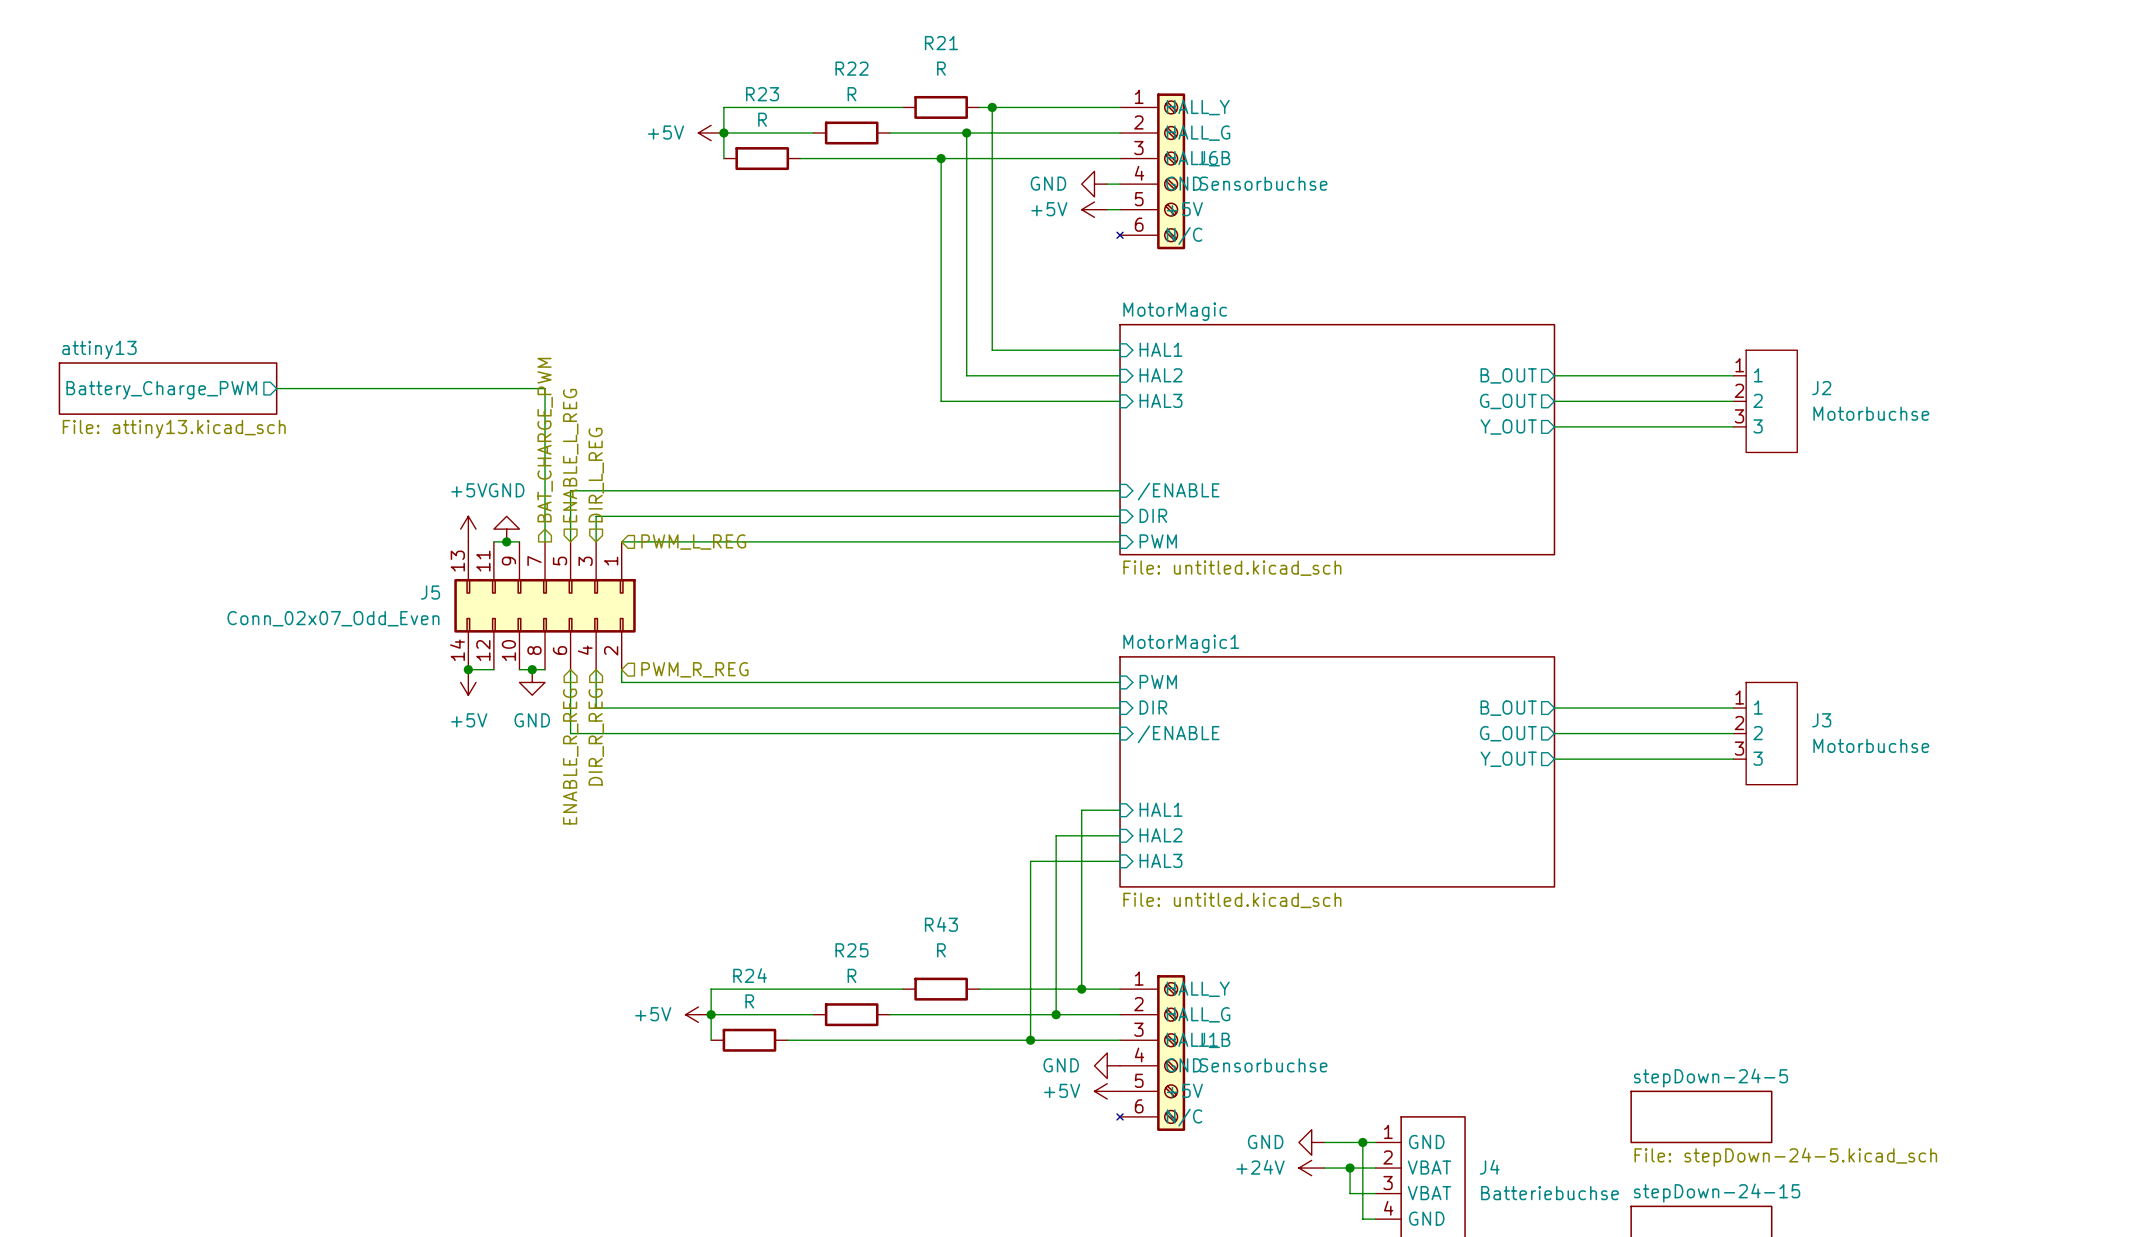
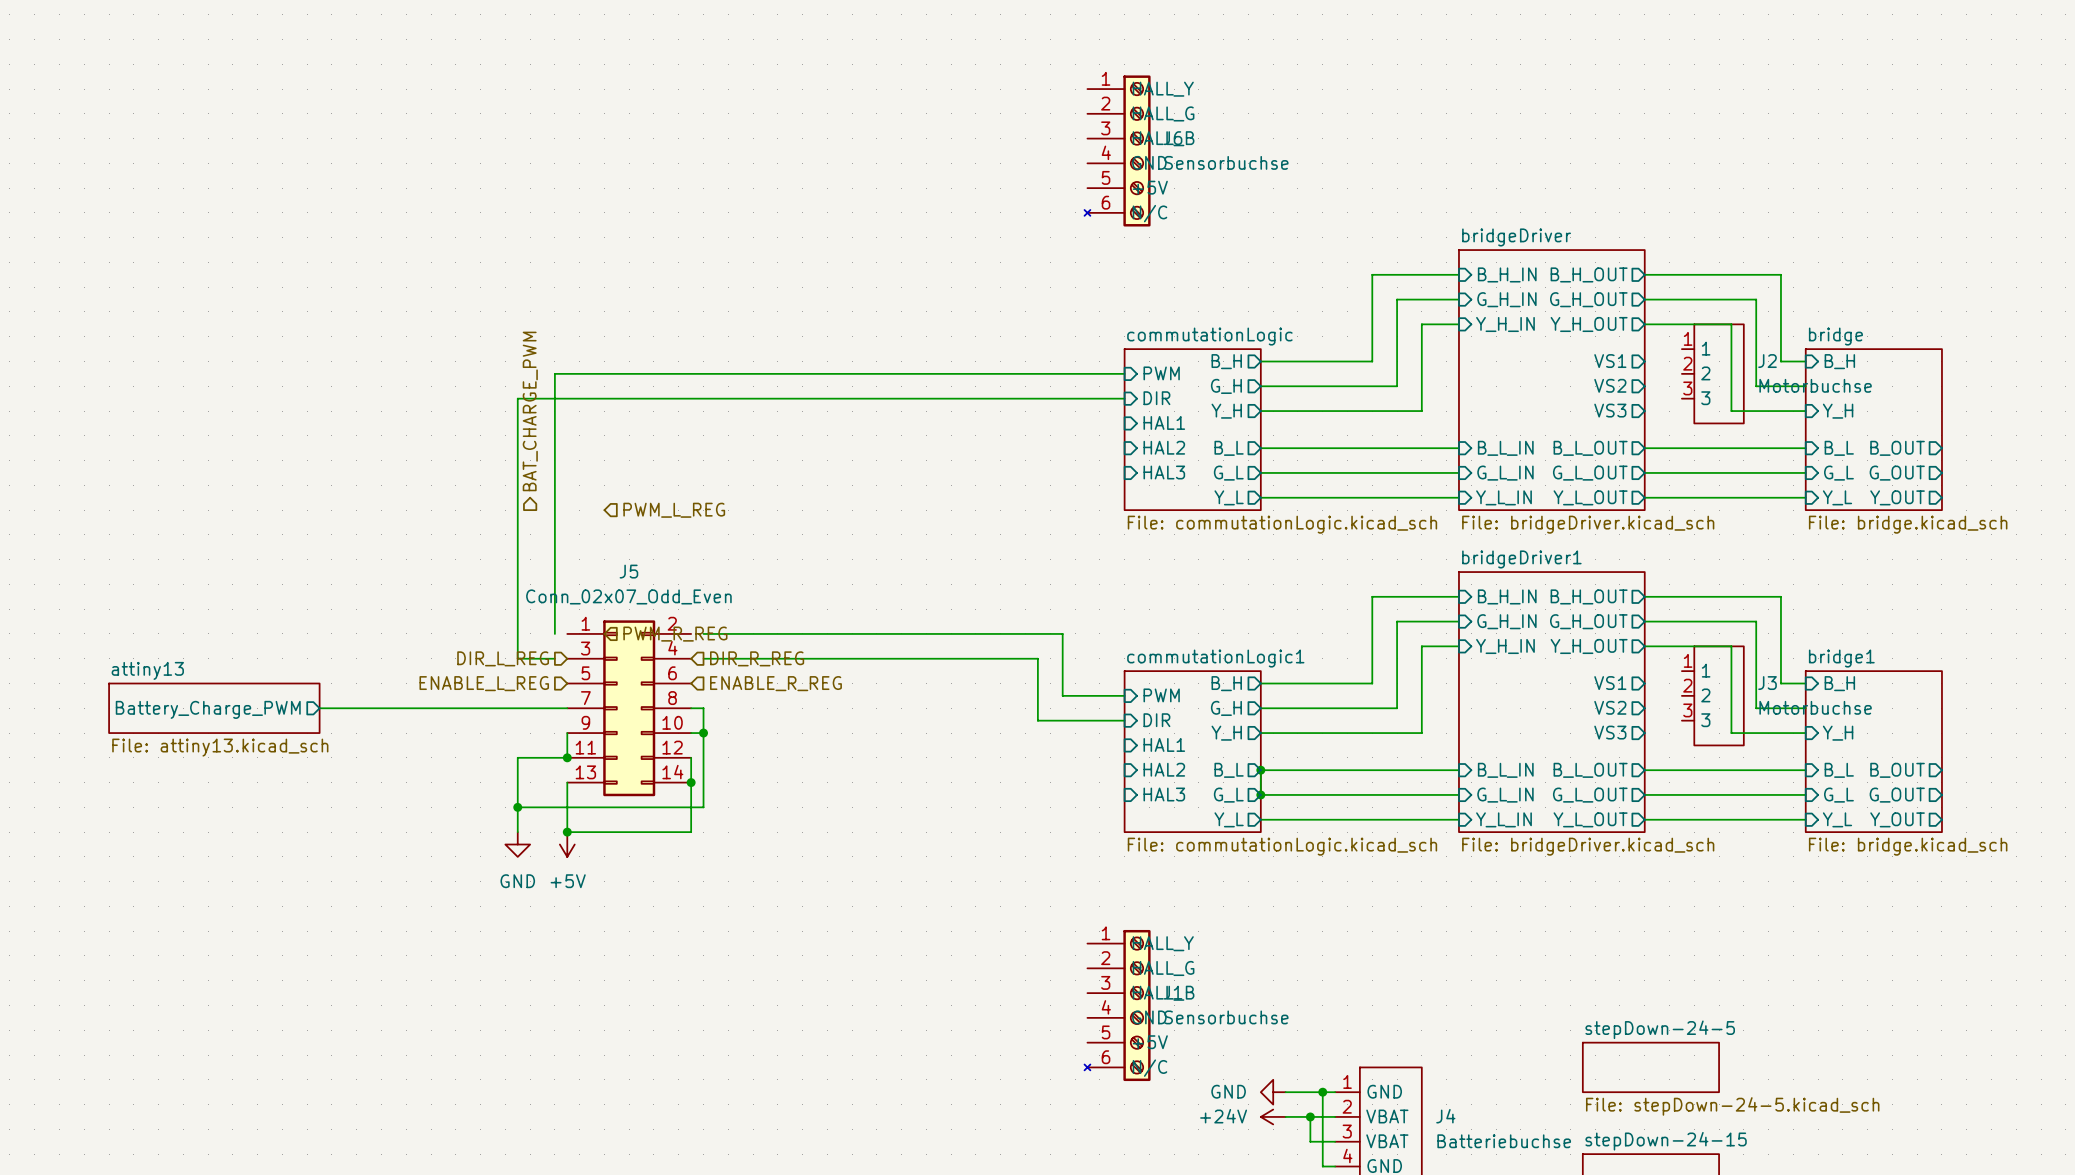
wire: (902, 107) (723, 107) (723, 158) -> none
R21: R (941, 107) -> none
wire: (979, 107) (1120, 107) -> none
wire: (992, 107) (992, 350) (1120, 350) -> none
junction: (992, 107) -> none
power symbol: +5V (711, 133) -> none
wire: (723, 133) (813, 133) -> none
junction: (723, 133) -> none
R22: R (851, 133) -> none
wire: (890, 133) (1120, 133) -> none
wire: (966, 133) (966, 375) (1120, 375) -> none
junction: (966, 133) -> none
R23: R (762, 158) -> none
wire: (800, 158) (1120, 158) -> none
wire: (941, 158) (941, 401) -> none
junction: (941, 158) -> none
power symbol: GND (1094, 184) -> none
wire: (1107, 184) (1120, 184) -> none
power symbol: +5V (1094, 209) -> none
wire: (1107, 209) (1120, 209) -> none
wire: none -> (1458, 274) (1372, 274) (1372, 361) (1260, 361)
sheet pin: none -> B_H_IN (1507, 274)
sheet pin: none -> B_H_OUT (1589, 274)
wire: none -> (1644, 274) (1780, 274) (1780, 361) (1805, 361)
wire: none -> (1458, 299) (1397, 299) (1397, 386) (1260, 386)
sheet pin: none -> G_H_IN (1506, 299)
sheet pin: none -> G_H_OUT (1588, 299)
wire: none -> (1644, 299) (1756, 299) (1756, 386) (1805, 386)
sheet pin position: HAL1 (1160, 349) -> HAL1 (1164, 422)
wire: none -> (1458, 324) (1421, 324) (1421, 411) (1260, 411)
sheet pin: none -> Y_H_IN (1505, 324)
sheet pin: none -> Y_H_OUT (1589, 324)
wire: none -> (1644, 324) (1731, 324) (1731, 411) (1805, 411)
sheet pin position: HAL2 (1160, 375) -> HAL2 (1164, 447)
sheet pin: B_OUT (1508, 375) -> none
wire: (1554, 375) (1733, 375) -> none
sheet attiny13 position: (168, 388) -> (214, 708)
wire: (276, 388) (545, 388) (545, 541) -> none
sheet pin: none -> B_H (1226, 361)
sheet pin: none -> VS1 (1610, 361)
sheet pin: none -> B_H (1839, 361)
sheet pin: Battery_Charge_PWM (161, 390) -> none
sheet pin position: HAL3 (1160, 400) -> HAL3 (1164, 472)
sheet pin: none -> PWM (1161, 373)
wire: none -> (1087, 373) (1124, 373)
sheet pin: G_OUT (1508, 401) -> none
wire: (1554, 401) (1733, 401) -> none
sheet bridgeDriver: none -> File: bridgeDriver.kicad_sch (1551, 380)
sheet pin: none -> VS2 (1610, 385)
sheet pin: none -> G_H (1226, 386)
wire: none -> (1124, 398) (517, 398) (517, 658) (554, 658)
wire: (1554, 426) (1733, 426) -> none
sheet pin: Y_OUT (1508, 427) -> none
sheet pin: none -> Y_H (1226, 411)
sheet MotorMagic: File: untitled.kicad_sch (1337, 439) -> none
sheet pin: none -> VS3 (1610, 410)
sheet pin: none -> Y_H (1838, 411)
hierarchical label rotation: 0° (570, 455) -> 90° counterclockwise (484, 683)
hierarchical label position: ENABLE_L_REG (570, 455) -> ENABLE_L_REG (484, 683)
sheet commutationLogic: none -> File: commutationLogic.kicad_sch (1192, 429)
sheet bridge: none -> File: bridge.kicad_sch (1873, 429)
hierarchical label rotation: 0° (596, 475) -> 90° counterclockwise (503, 658)
hierarchical label position: DIR_L_REG (596, 475) -> DIR_L_REG (503, 658)
sheet pin: none -> B_L (1229, 448)
wire: none -> (1260, 448) (1458, 448)
sheet pin: none -> B_L_IN (1505, 448)
sheet pin: none -> B_L_OUT (1590, 448)
wire: none -> (1644, 448) (1805, 448)
sheet pin: none -> B_L (1839, 448)
sheet pin: none -> B_OUT (1897, 448)
wire: (570, 490) (1120, 490) -> (554, 460) (554, 373) (914, 373)
sheet pin: /ENABLE (1178, 491) -> none
sheet pin: none -> G_L (1228, 473)
wire: none -> (1260, 472) (1458, 472)
sheet pin: none -> G_L_IN (1505, 473)
sheet pin: none -> G_L_OUT (1590, 473)
wire: none -> (1644, 472) (1805, 472)
sheet pin: none -> G_L (1838, 473)
sheet pin: none -> G_OUT (1897, 473)
sheet pin position: DIR (1153, 515) -> DIR (1156, 398)
wire: (1120, 516) (596, 516) (596, 541) -> none
power symbol: +5V (468, 529) -> none
power symbol: GND (506, 529) -> none
sheet pin: none -> Y_L (1229, 497)
wire: none -> (1260, 497) (1458, 497)
sheet pin: none -> Y_L_IN (1503, 497)
sheet pin: none -> Y_L_OUT (1590, 497)
wire: none -> (1644, 497) (1805, 497)
sheet pin: none -> Y_L (1837, 497)
sheet pin: none -> Y_OUT (1897, 497)
wire: (493, 541) (519, 541) -> none
junction: (506, 541) -> none
wire: (621, 541) (1120, 541) -> none
sheet pin: PWM (1158, 541) -> none
J5 name position: J5 (430, 592) -> J5 (628, 571)
J5 rotation: 0° (545, 605) -> 90° counterclockwise (629, 708)
J5 position: (545, 605) -> (629, 708)
J5 value position: Conn_02x07_Odd_Even (333, 618) -> Conn_02x07_Odd_Even (628, 596)
wire: none -> (1458, 596) (1372, 596) (1372, 683) (1260, 683)
sheet pin: none -> B_H_IN (1507, 596)
sheet pin: none -> B_H_OUT (1589, 596)
wire: none -> (1644, 596) (1780, 596) (1780, 683) (1805, 683)
wire: none -> (1458, 621) (1397, 621) (1397, 708) (1260, 708)
wire: none -> (1644, 621) (1756, 621) (1756, 708) (1805, 708)
sheet pin: none -> G_H_IN (1506, 621)
sheet pin: none -> G_H_OUT (1588, 621)
wire: (468, 669) (493, 669) -> none
junction: (468, 669) -> none
wire: (519, 669) (545, 669) -> none
junction: (532, 669) -> none
wire: (570, 669) (570, 733) (1094, 733) -> (703, 633) (1062, 633) (1062, 695)
wire: (596, 669) (596, 708) (1120, 708) -> none
wire: (621, 669) (621, 682) (1120, 682) -> none
sheet pin position: PWM (1158, 681) -> PWM (1161, 695)
power symbol: +5V (468, 682) -> none
power symbol: GND (532, 682) -> none
wire: none -> (1458, 646) (1421, 646) (1421, 733) (1260, 733)
sheet pin: none -> Y_H_IN (1505, 646)
sheet pin: none -> Y_H_OUT (1589, 646)
wire: none -> (1644, 646) (1731, 646) (1731, 733) (1805, 733)
wire: none -> (703, 658) (1037, 658) (1037, 720) (1124, 720)
sheet pin position: DIR (1153, 707) -> DIR (1156, 720)
sheet pin: B_OUT (1508, 708) -> none
wire: (1554, 708) (1733, 708) -> none
sheet pin: none -> B_H (1226, 683)
sheet pin: none -> VS1 (1610, 683)
sheet pin: none -> B_H (1839, 683)
wire: none -> (1087, 695) (1124, 695)
sheet pin: G_OUT (1508, 733) -> none
wire: (1554, 733) (1733, 733) -> none
sheet pin: /ENABLE (1178, 734) -> none
hierarchical label rotation: 0° (596, 737) -> 90° counterclockwise (757, 658)
hierarchical label position: DIR_R_REG (596, 737) -> DIR_R_REG (757, 658)
sheet bridgeDriver1: none -> File: bridgeDriver.kicad_sch (1551, 702)
sheet pin: none -> VS2 (1610, 707)
wire: none -> (319, 708) (567, 708)
wire: none -> (691, 708) (703, 708) (703, 807) (517, 807)
sheet pin: none -> G_H (1226, 708)
sheet pin: none -> Battery_Charge_PWM (208, 709)
hierarchical label rotation: 0° (570, 756) -> 90° counterclockwise (775, 683)
hierarchical label position: ENABLE_R_REG (570, 756) -> ENABLE_R_REG (775, 683)
sheet pin: Y_OUT (1508, 759) -> none
wire: (1554, 759) (1733, 759) -> none
wire: none -> (567, 733) (567, 757) (517, 757) (517, 832)
wire: none -> (691, 733) (703, 733)
junction: none -> (703, 733)
sheet MotorMagic1: File: untitled.kicad_sch (1337, 771) -> none
sheet pin: none -> VS3 (1610, 732)
sheet pin: none -> Y_H (1226, 733)
sheet pin: none -> Y_H (1838, 733)
sheet commutationLogic1: none -> File: commutationLogic.kicad_sch (1192, 751)
sheet bridge1: none -> File: bridge.kicad_sch (1873, 751)
junction: none -> (567, 757)
wire: none -> (691, 757) (691, 832) (567, 832) (567, 782)
sheet pin position: HAL1 (1160, 809) -> HAL1 (1164, 744)
wire: (1120, 810) (1081, 810) (1081, 989) -> none
sheet pin: none -> B_L (1229, 770)
junction: none -> (1260, 770)
wire: none -> (1458, 770) (1260, 770) (1260, 794) (1458, 794)
sheet pin: none -> B_L_IN (1505, 770)
sheet pin: none -> B_L_OUT (1590, 770)
wire: none -> (1644, 770) (1805, 770)
sheet pin: none -> B_L (1839, 770)
sheet pin: none -> B_OUT (1897, 770)
junction: none -> (691, 782)
wire: (1120, 835) (1056, 835) (1056, 1014) -> none
sheet pin position: HAL2 (1160, 835) -> HAL2 (1164, 769)
sheet pin: none -> G_L (1228, 795)
junction: none -> (1260, 794)
sheet pin: none -> G_L_IN (1505, 795)
sheet pin: none -> G_L_OUT (1590, 795)
wire: none -> (1644, 794) (1805, 794)
sheet pin: none -> G_L (1838, 795)
sheet pin: none -> G_OUT (1897, 795)
junction: none -> (517, 807)
sheet pin position: HAL3 (1160, 860) -> HAL3 (1164, 794)
wire: (1120, 861) (1030, 861) (1030, 1040) -> none
sheet pin: none -> Y_L (1229, 819)
wire: none -> (1260, 819) (1458, 819)
sheet pin: none -> Y_L_IN (1503, 819)
sheet pin: none -> Y_L_OUT (1590, 819)
wire: none -> (1644, 819) (1805, 819)
sheet pin: none -> Y_L (1837, 819)
sheet pin: none -> Y_OUT (1897, 819)
junction: none -> (567, 832)
power symbol: none -> GND (517, 844)
power symbol: none -> +5V (567, 844)
wire: (902, 989) (711, 989) (711, 1040) -> none
R43: R (941, 989) -> none
wire: (979, 989) (1120, 989) -> none
junction: (1081, 989) -> none
power symbol: +5V (698, 1014) -> none
wire: (711, 1014) (813, 1014) -> none
junction: (711, 1014) -> none
R25: R (851, 1014) -> none
wire: (890, 1014) (1120, 1014) -> none
junction: (1056, 1014) -> none
R24: R (749, 1040) -> none
wire: (787, 1040) (1120, 1040) -> none
junction: (1030, 1040) -> none
power symbol: GND (1107, 1065) -> none
power symbol: +5V (1107, 1091) -> none

